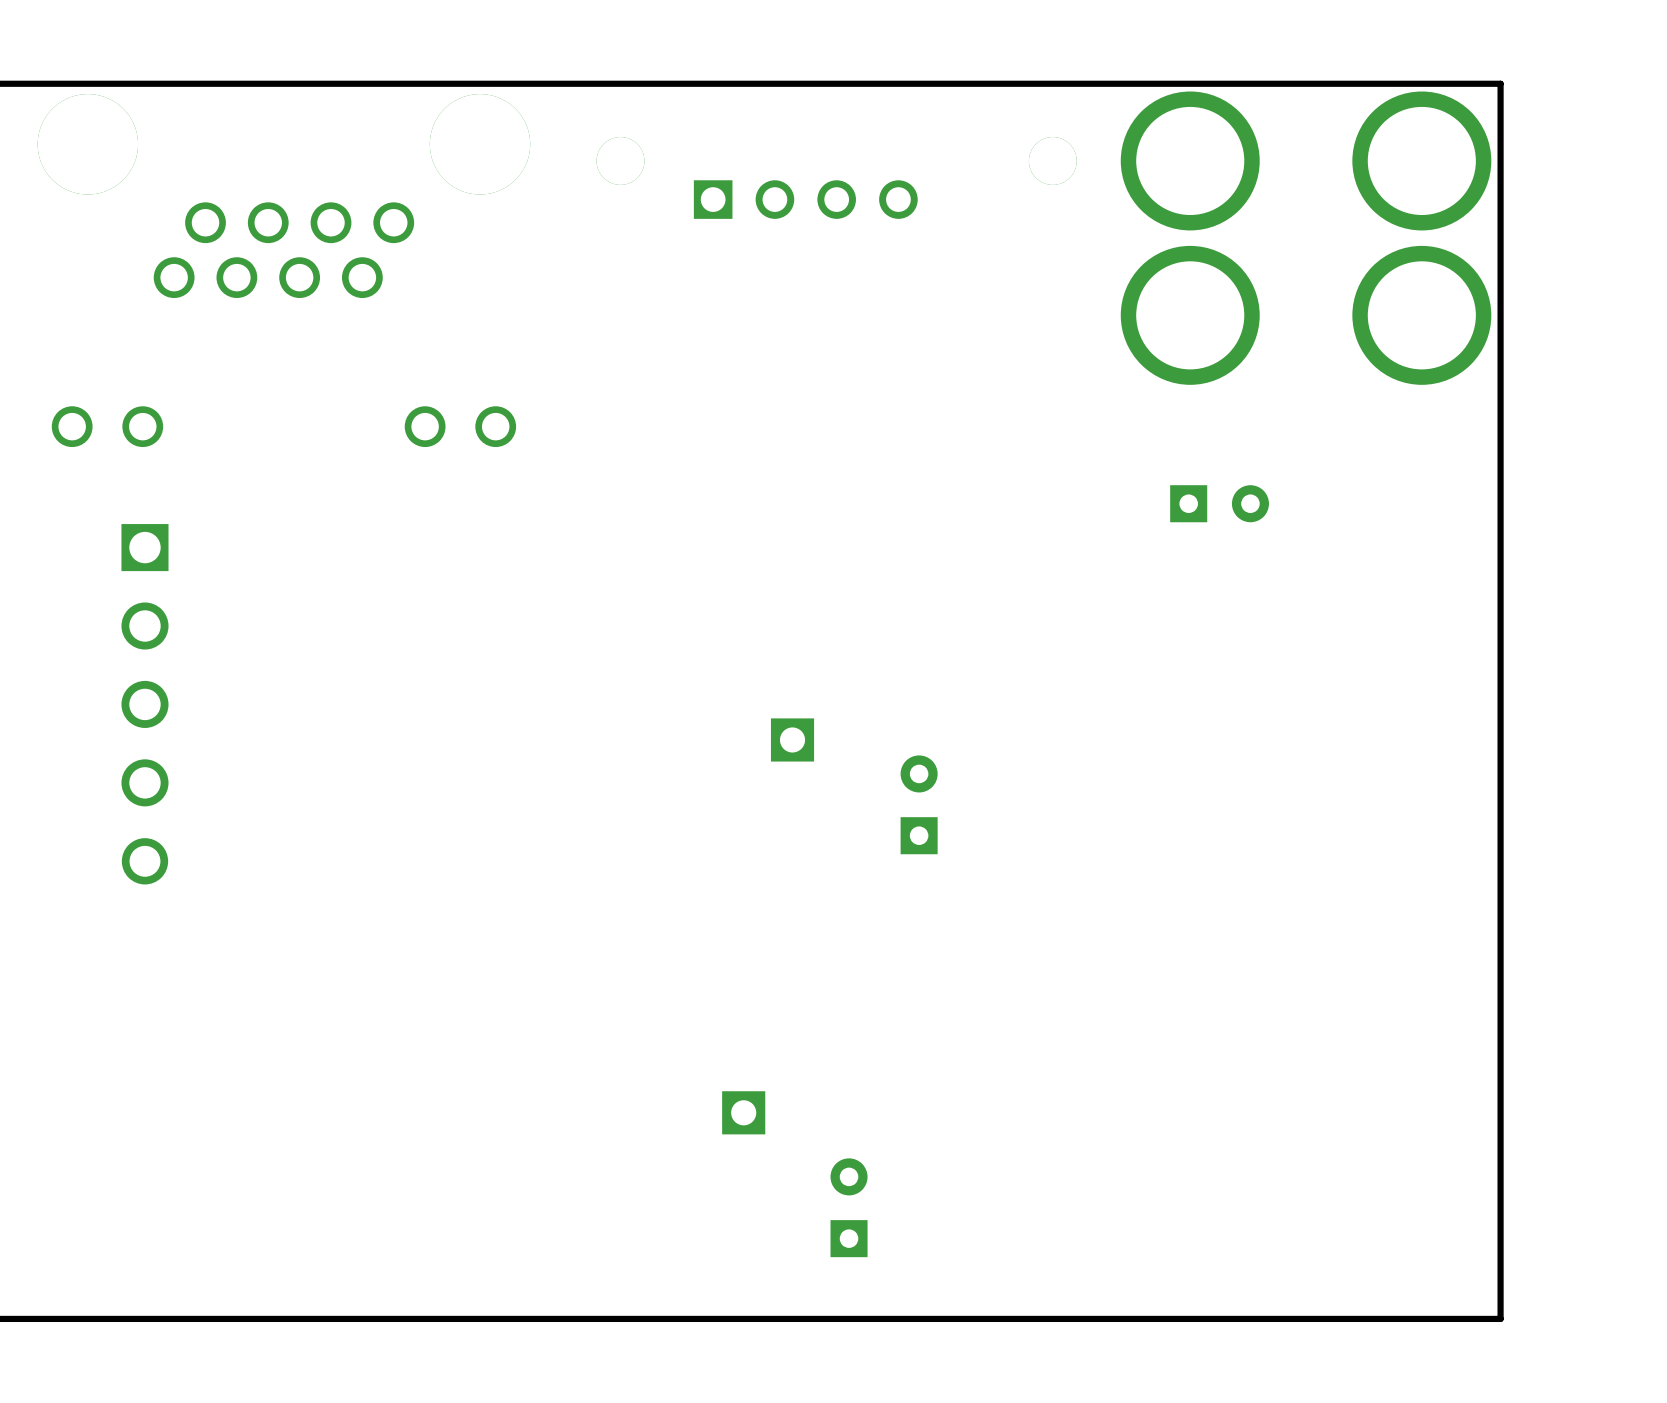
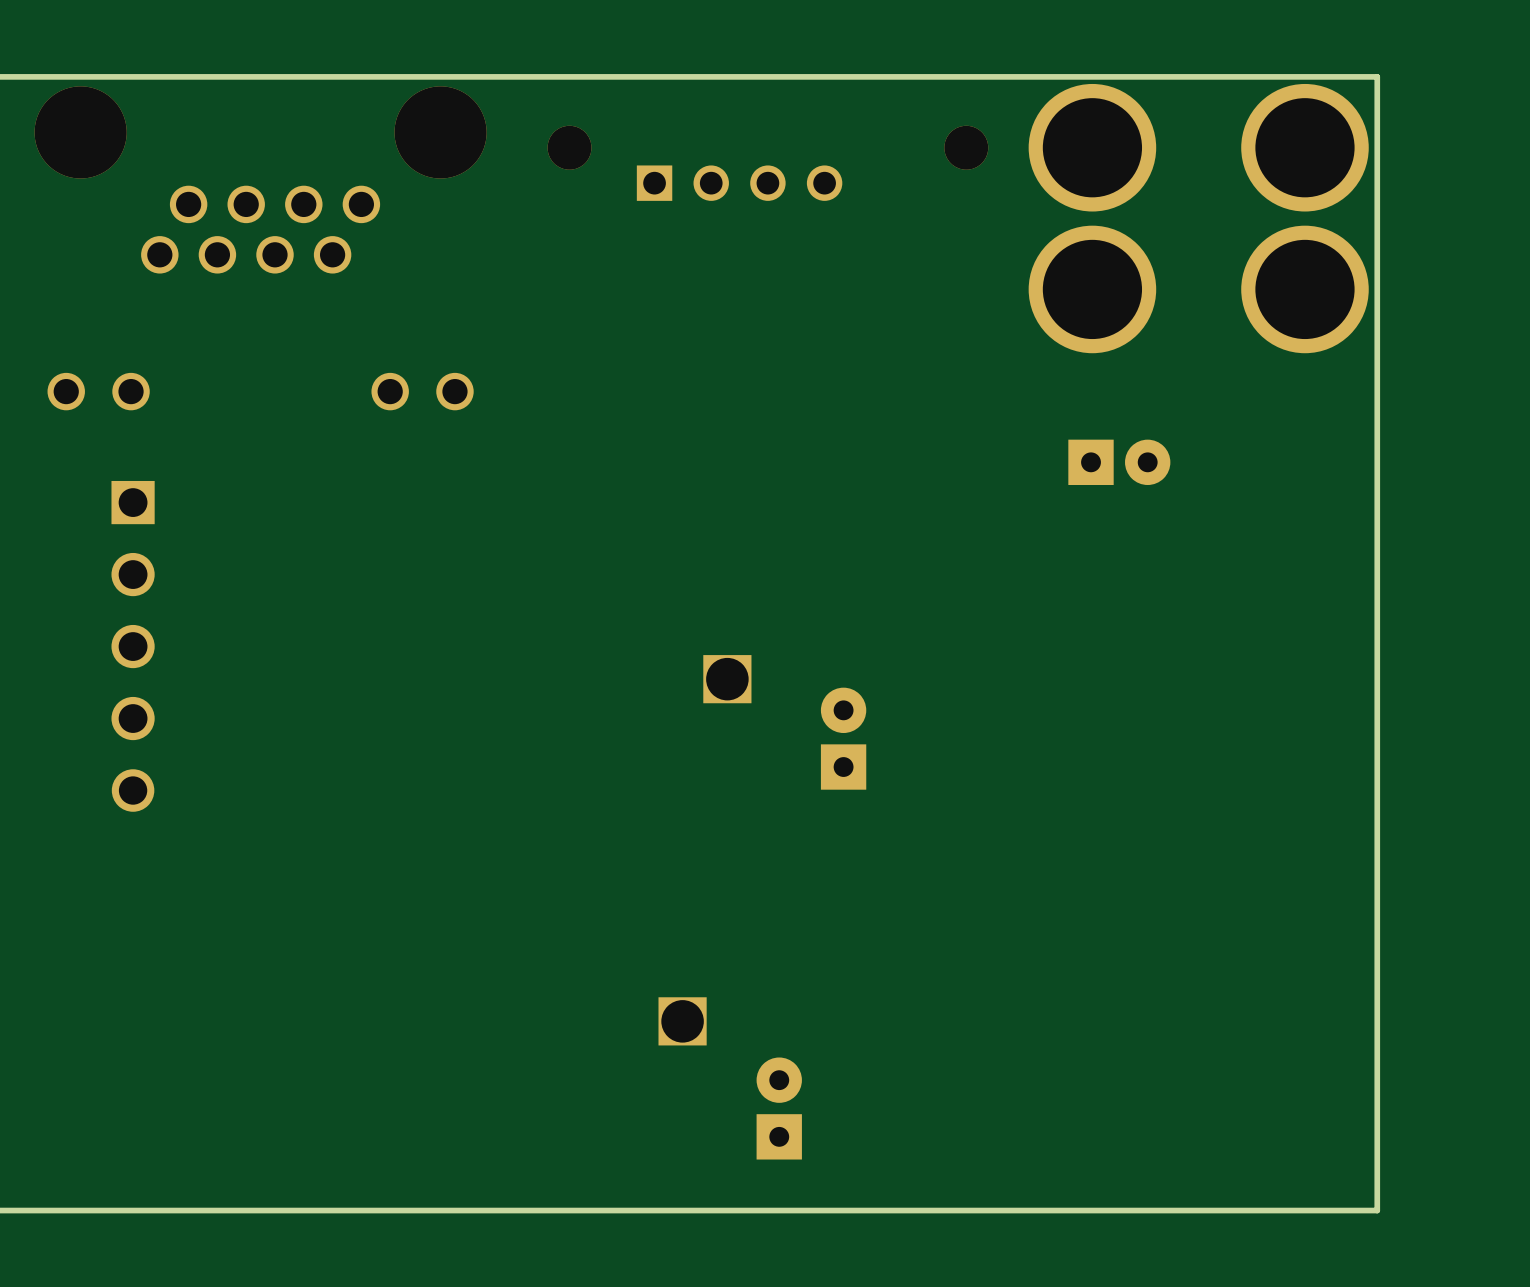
part footprint: [1170, 485, 1269, 523] -> [1068, 439, 1171, 486]
part footprint: [770, 718, 815, 762] -> [703, 655, 752, 704]
part footprint: [900, 755, 938, 855] -> [820, 687, 867, 790]
part footprint: [722, 1091, 766, 1135] -> [658, 997, 707, 1046]
part footprint: [830, 1158, 868, 1258] -> [756, 1057, 802, 1160]

